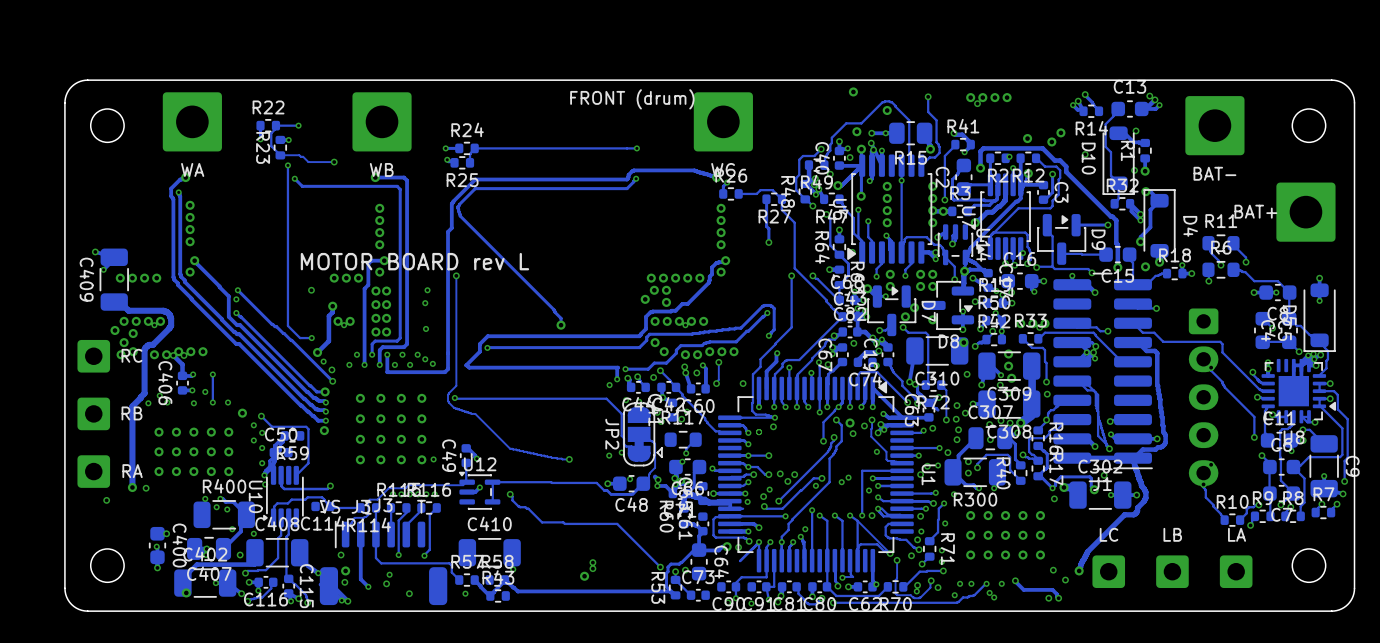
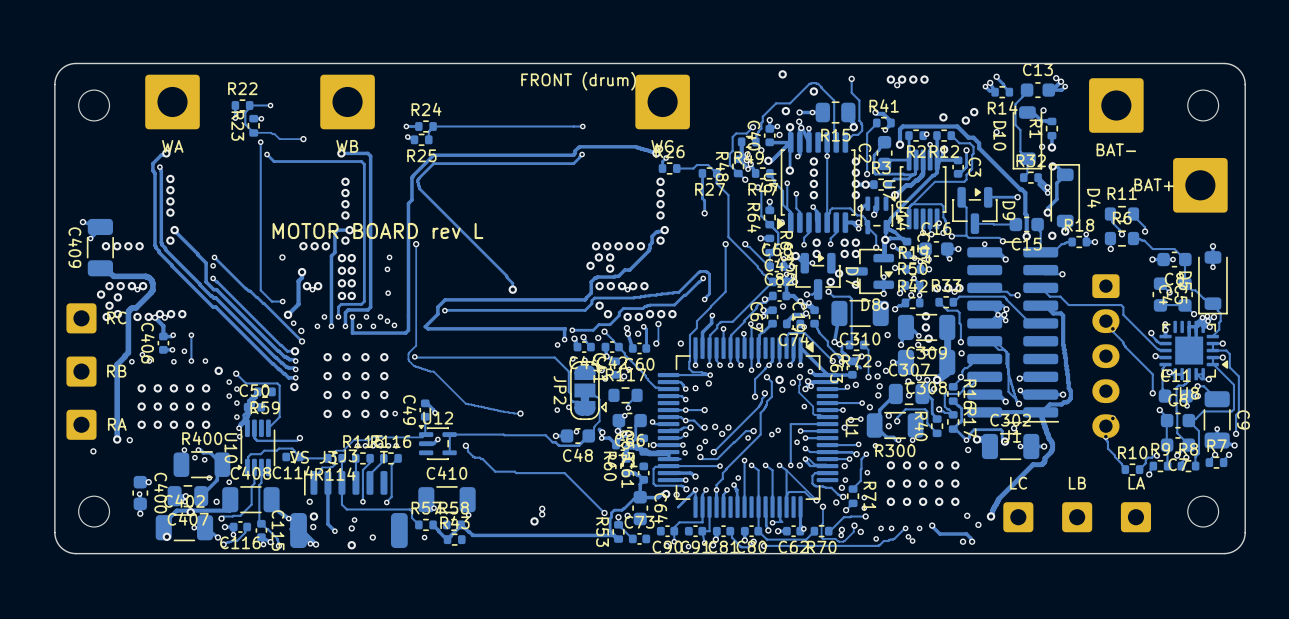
via: none -> (434, 508)
via: none -> (190, 512)
via: none -> (351, 545)

